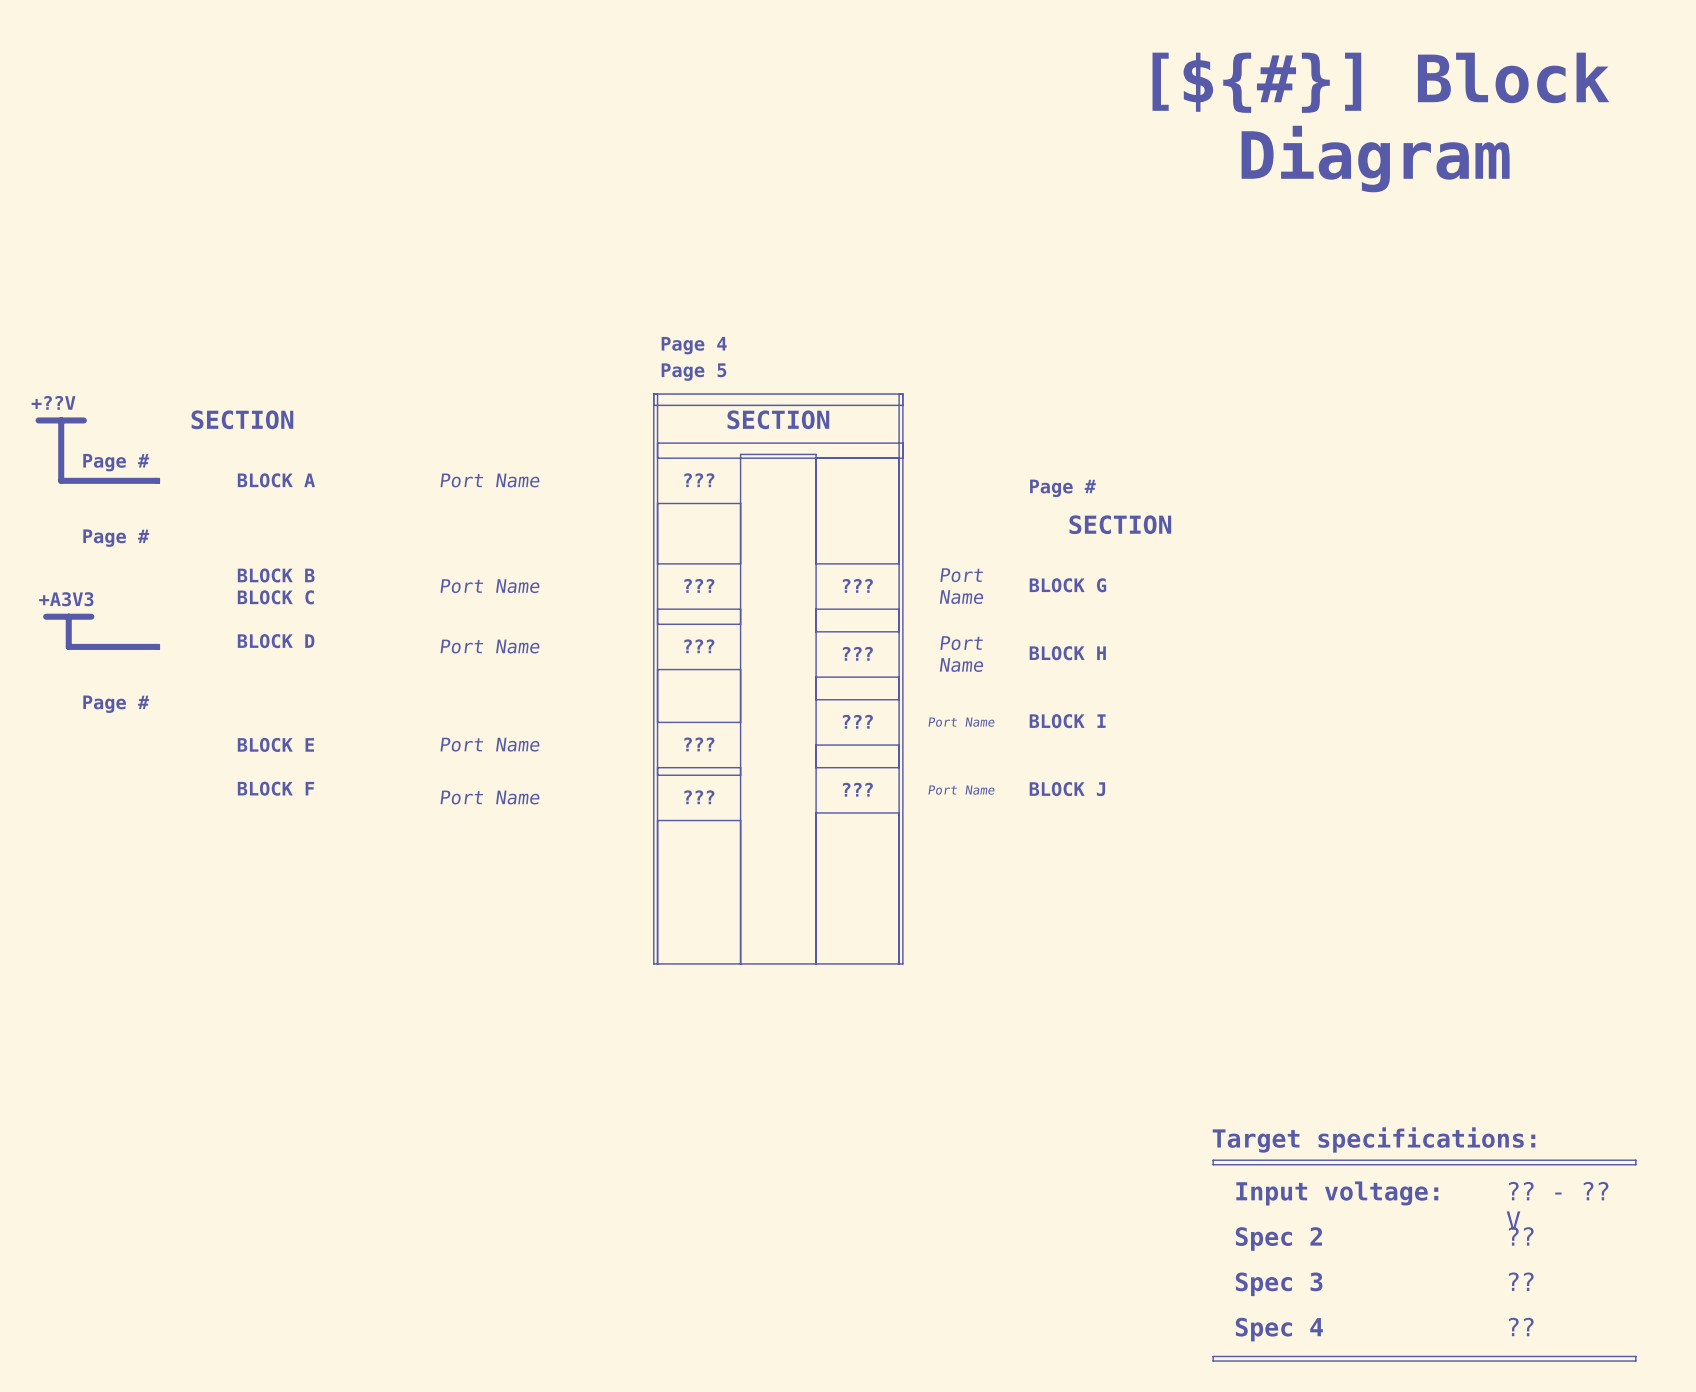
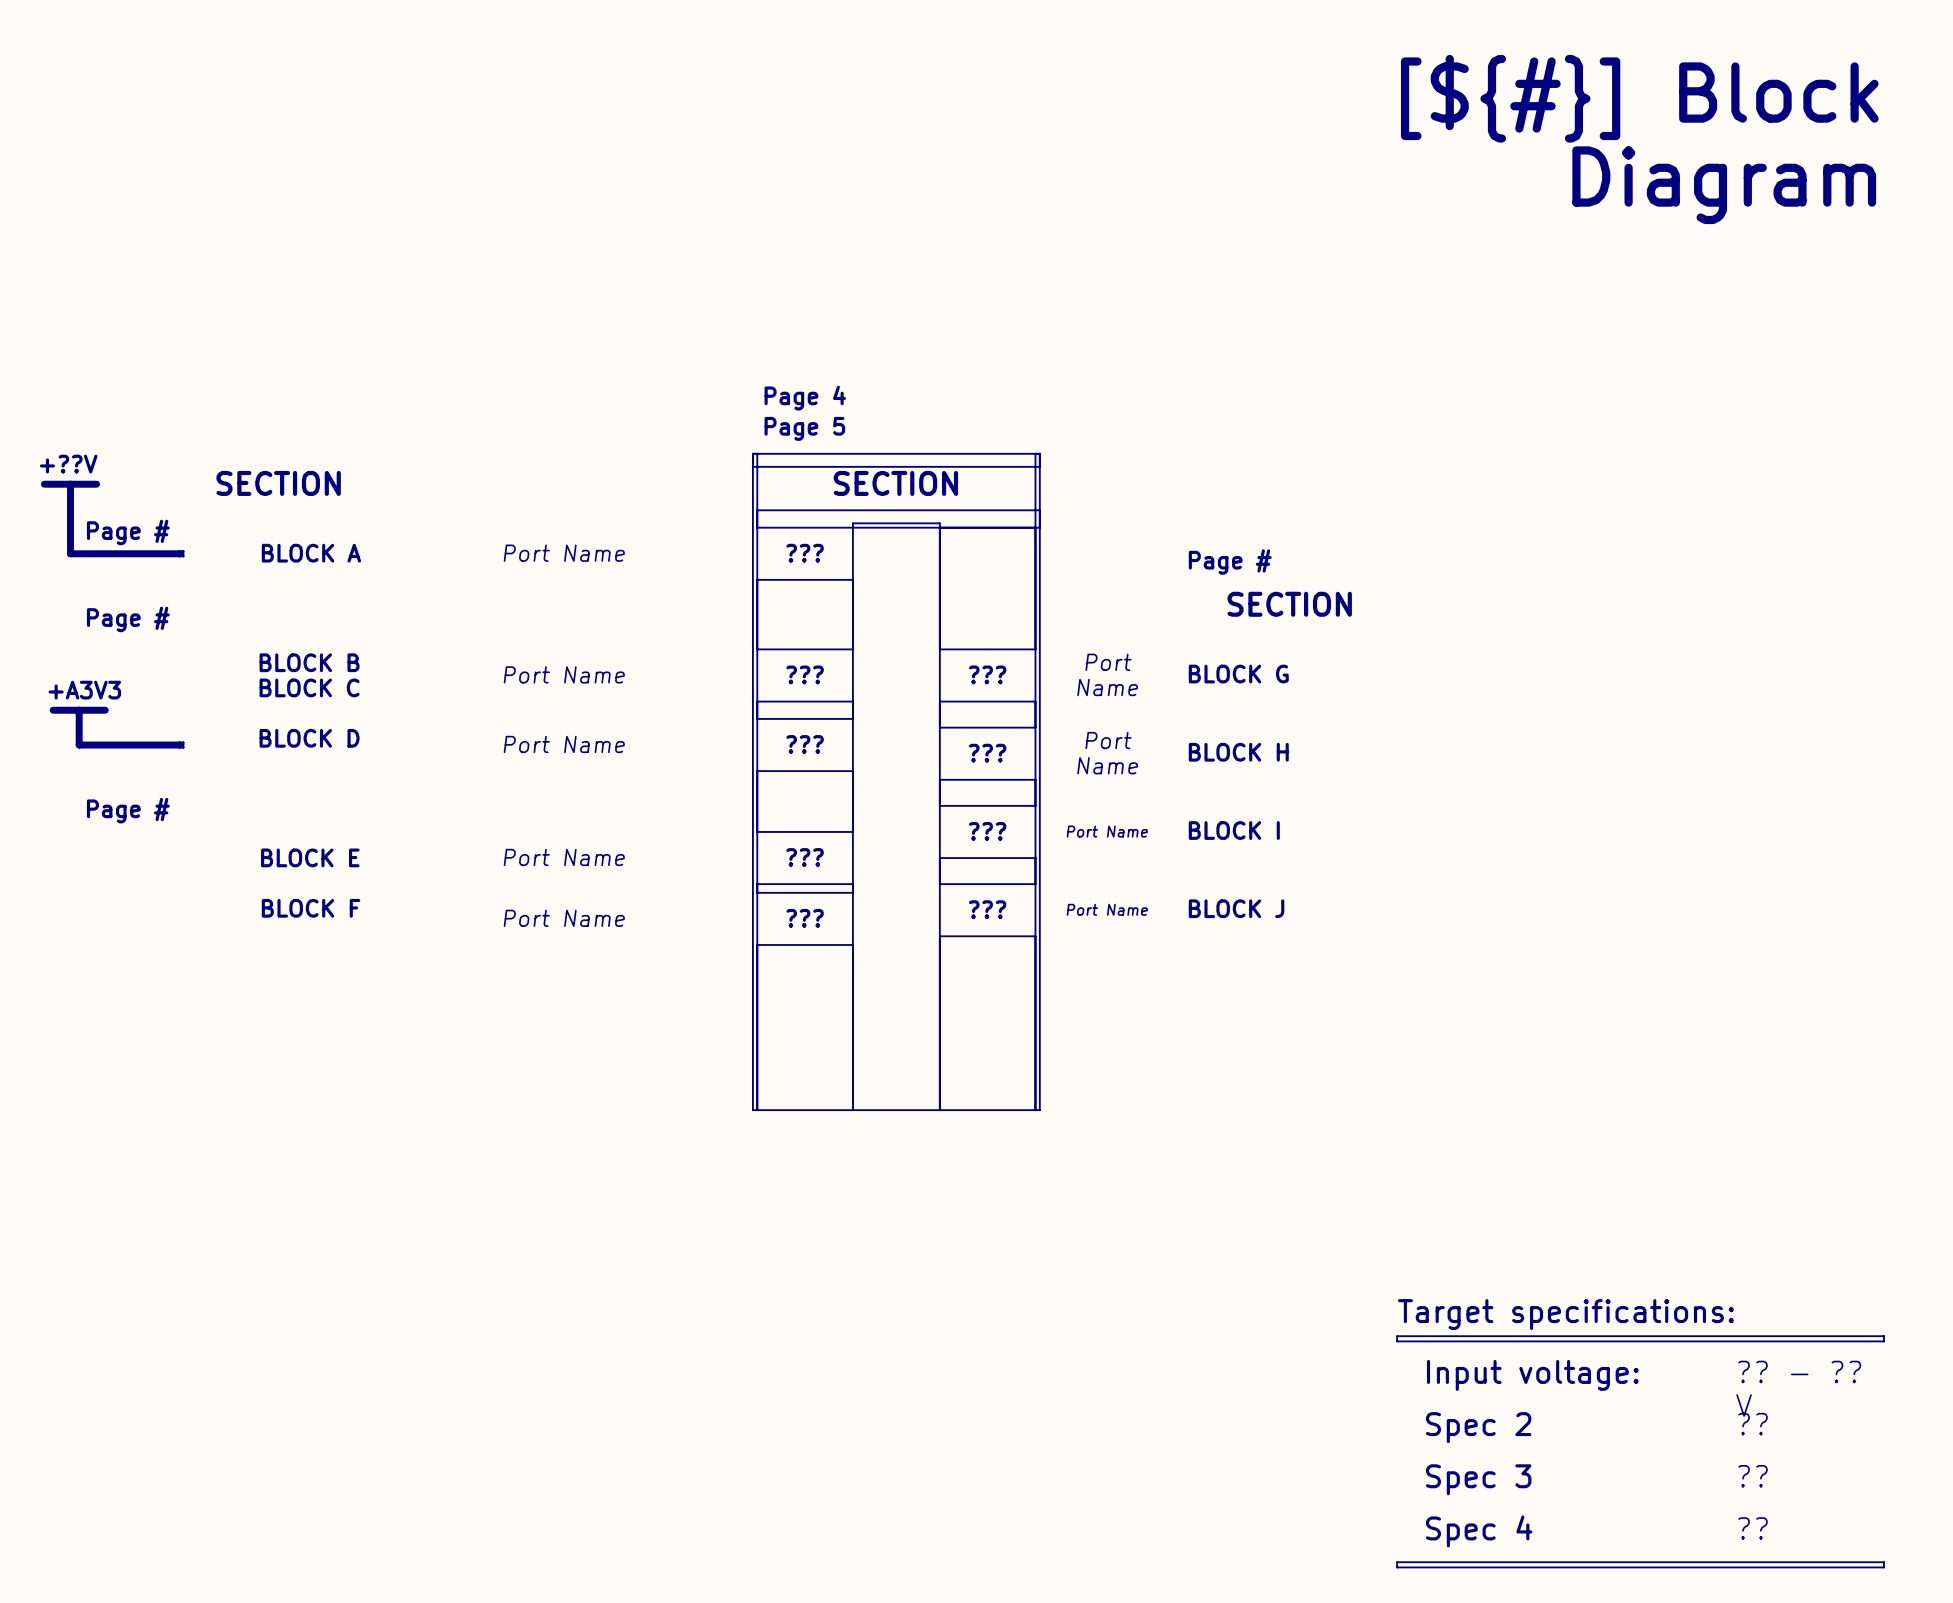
text: [${#}] Block (1380, 82) -> none
text: none -> [${#}] Block (1639, 98)
text: none -> Diagram (1724, 185)
text: Diagram (1375, 159) -> none

